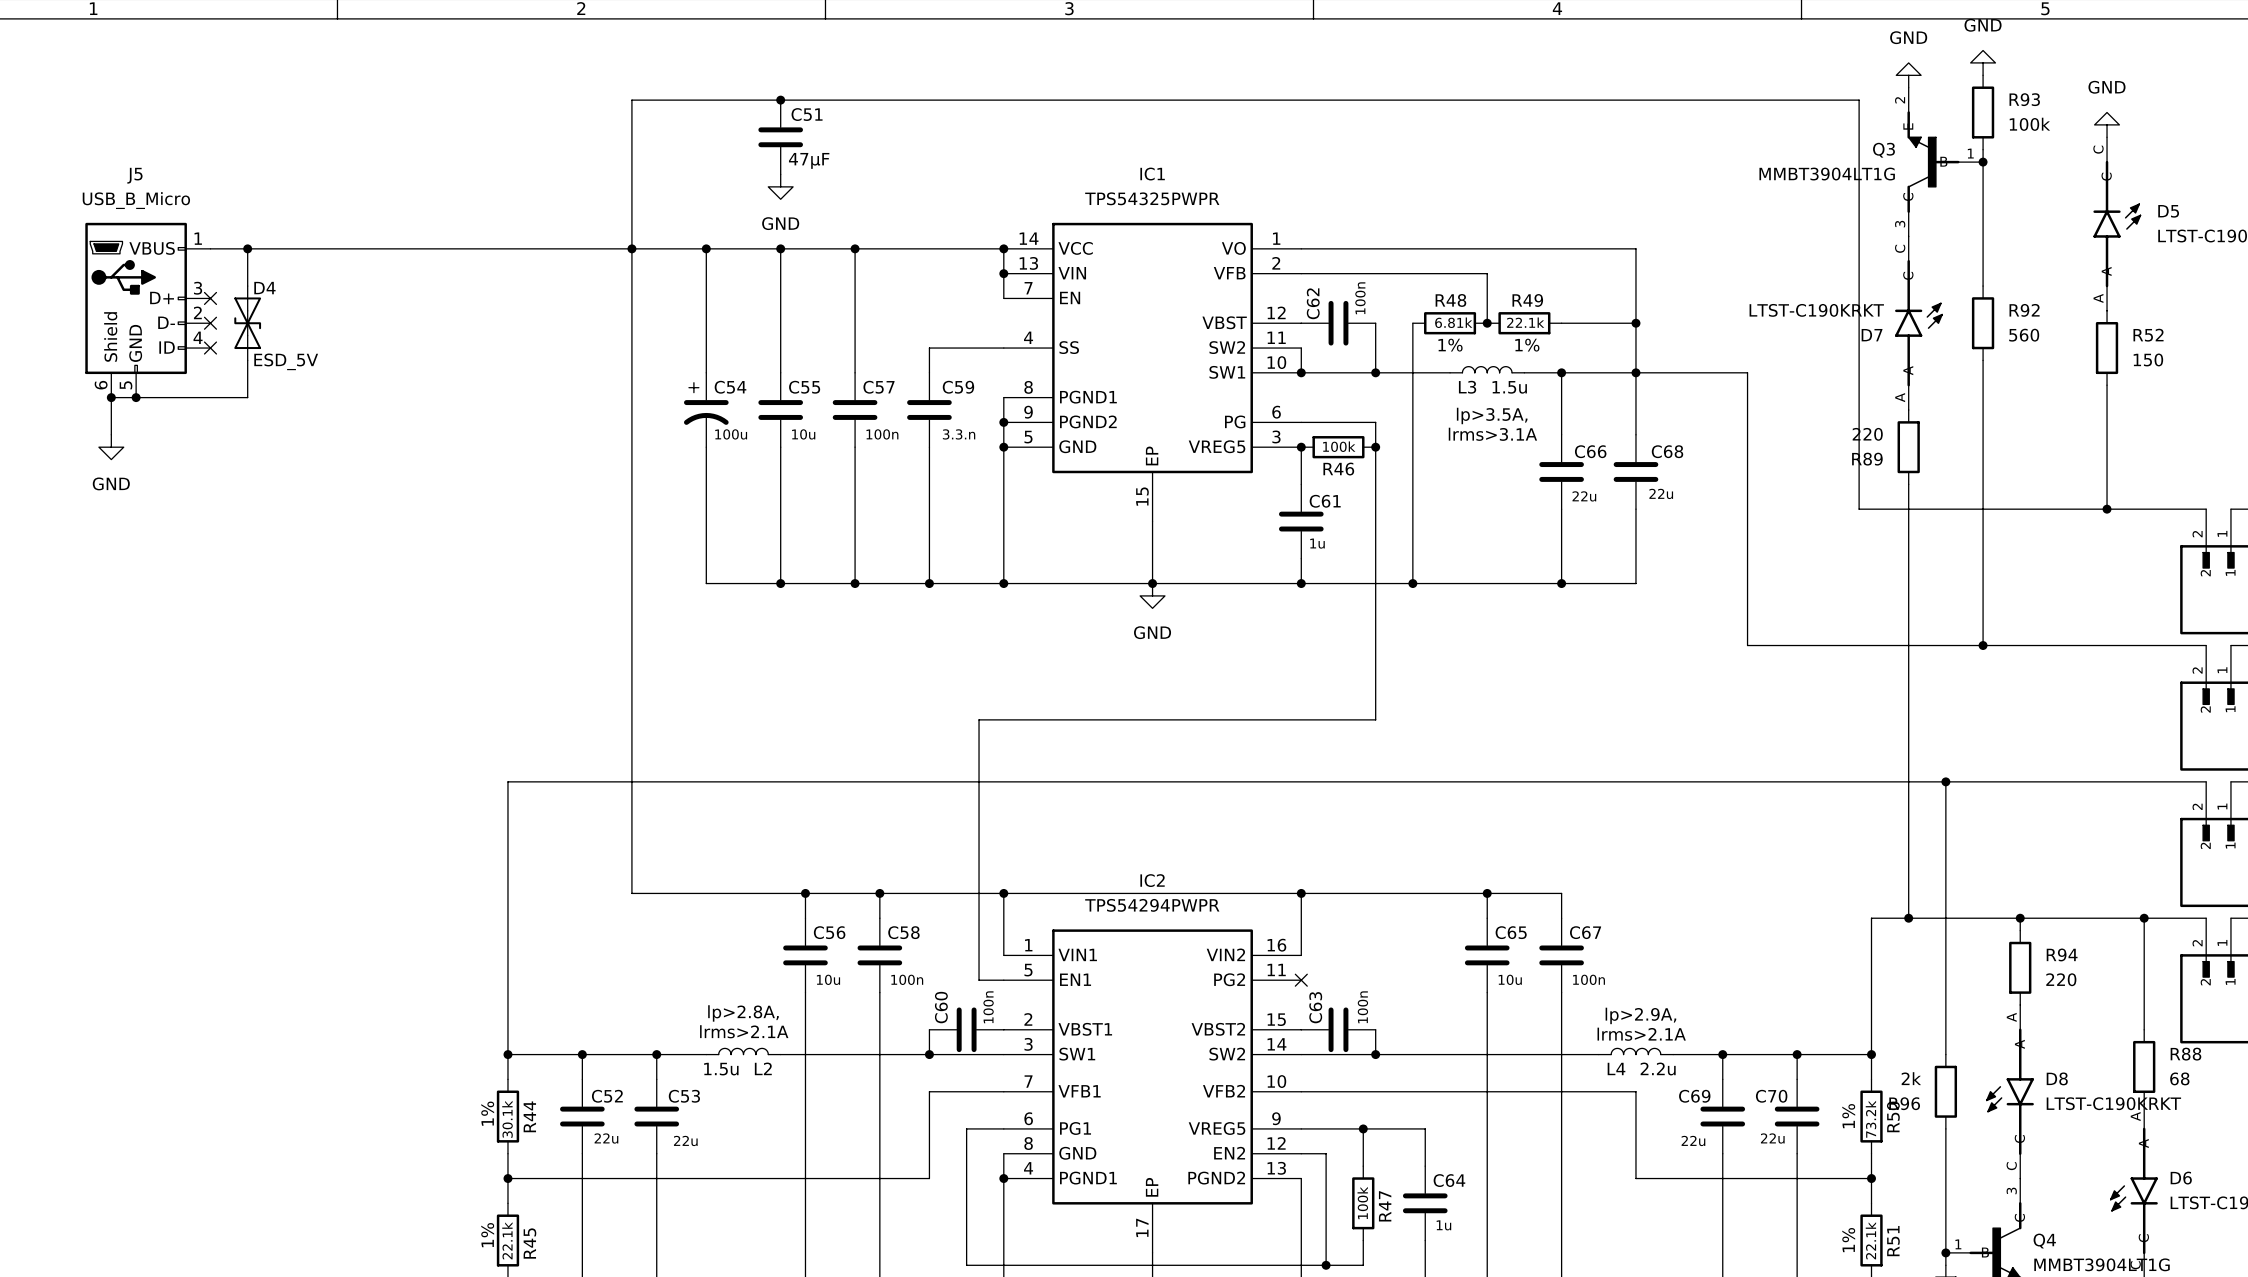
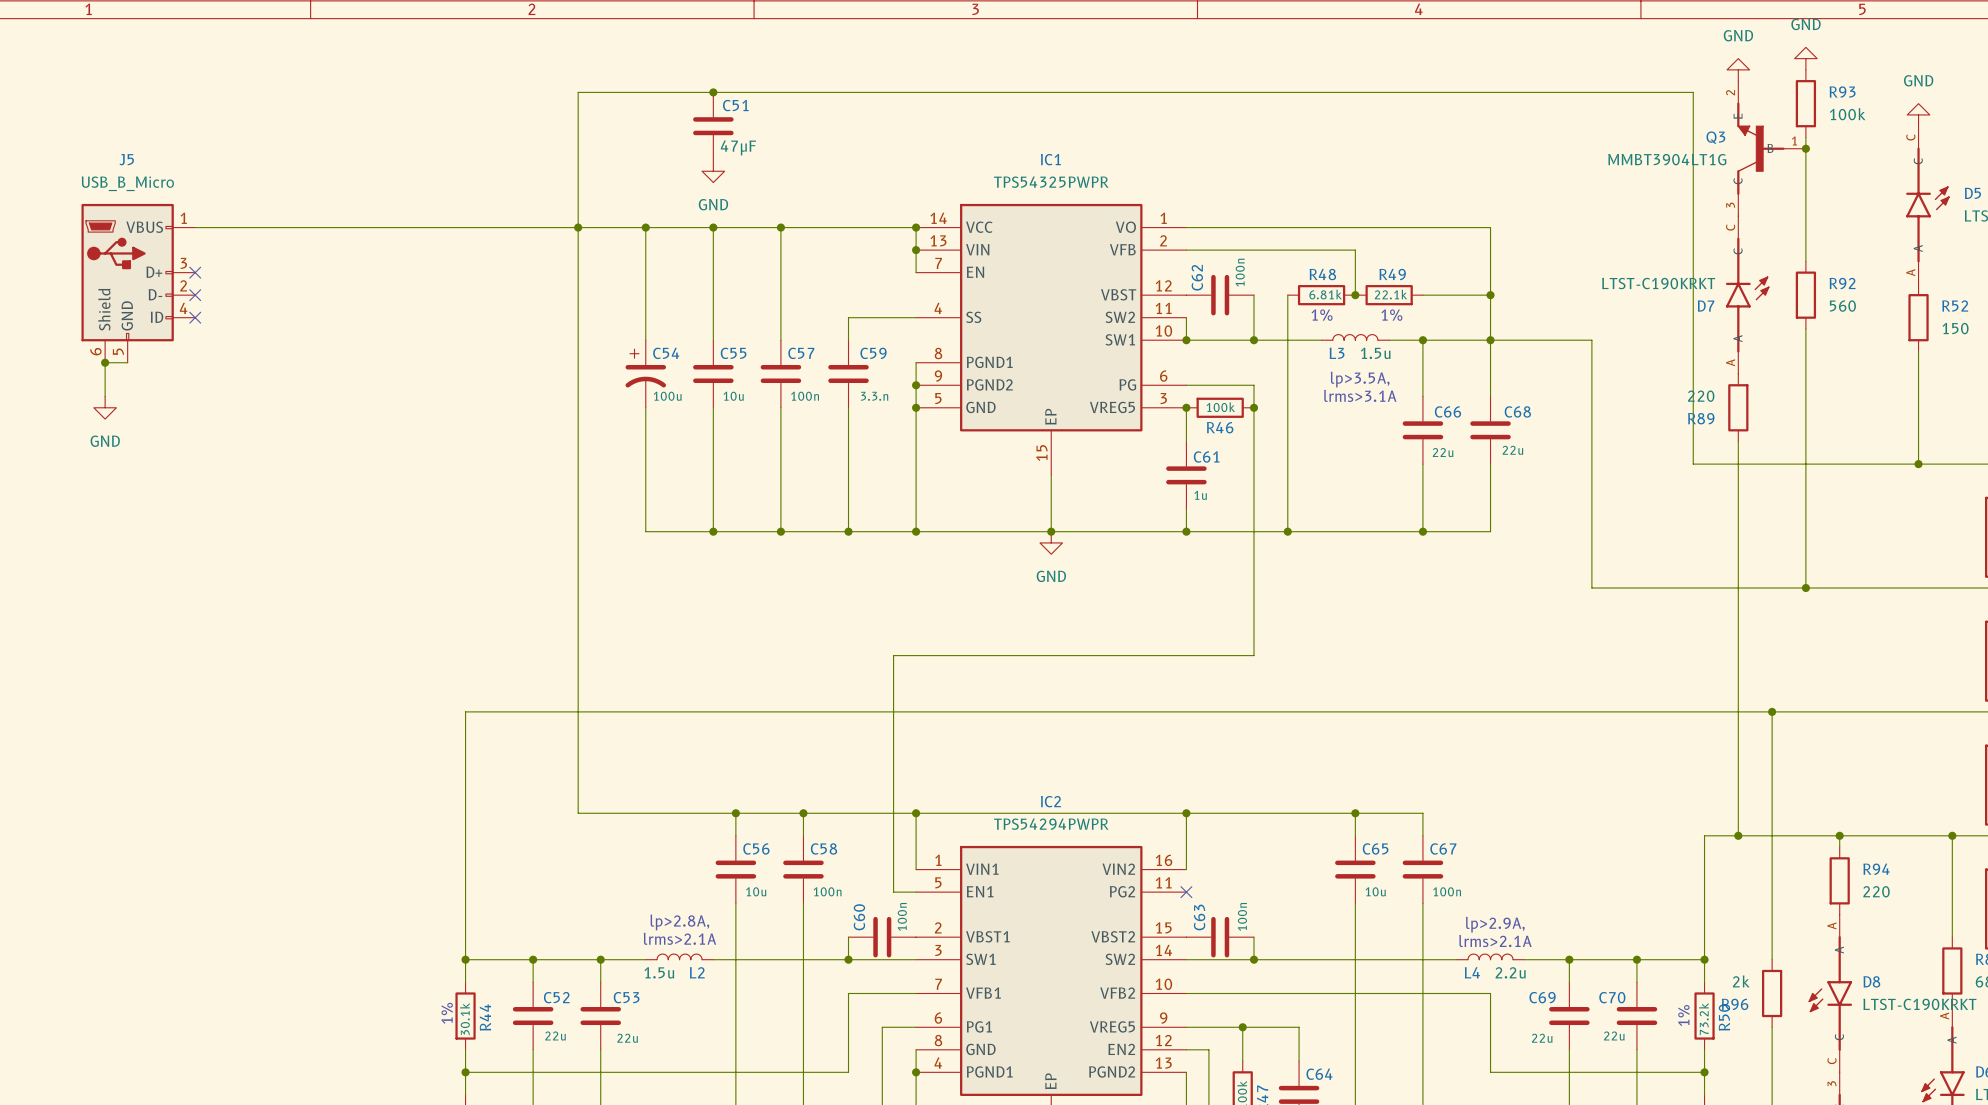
wire: (247, 248) (247, 286) -> none
junction: (247, 248) -> none
D4: ESD_5V (247, 323) -> none
wire: (247, 360) (247, 397) (136, 397) -> none
junction: (136, 397) -> none

